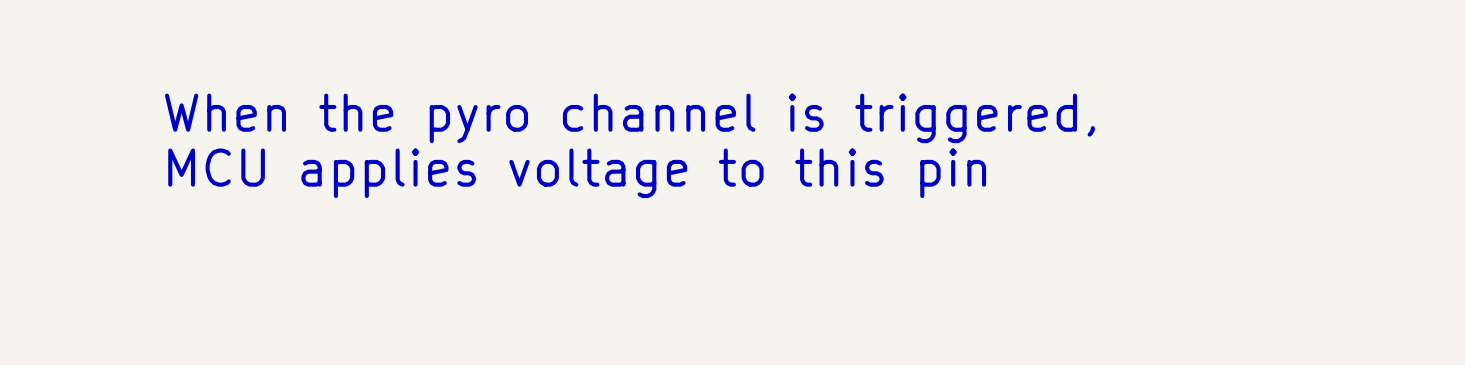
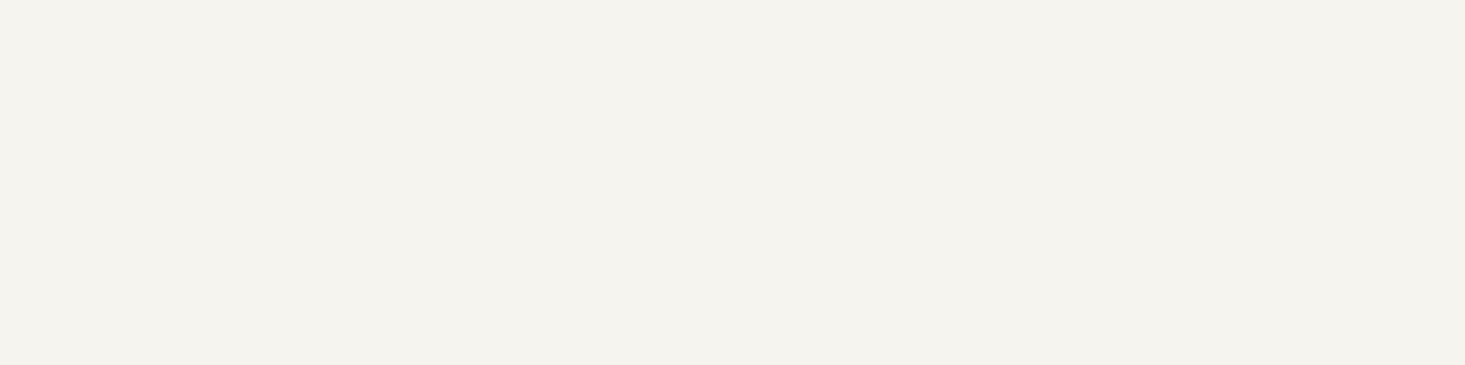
text: When the pyro channel is triggered, (629, 118) -> none
text: MCU applies voltage to this pin (577, 173) -> none

